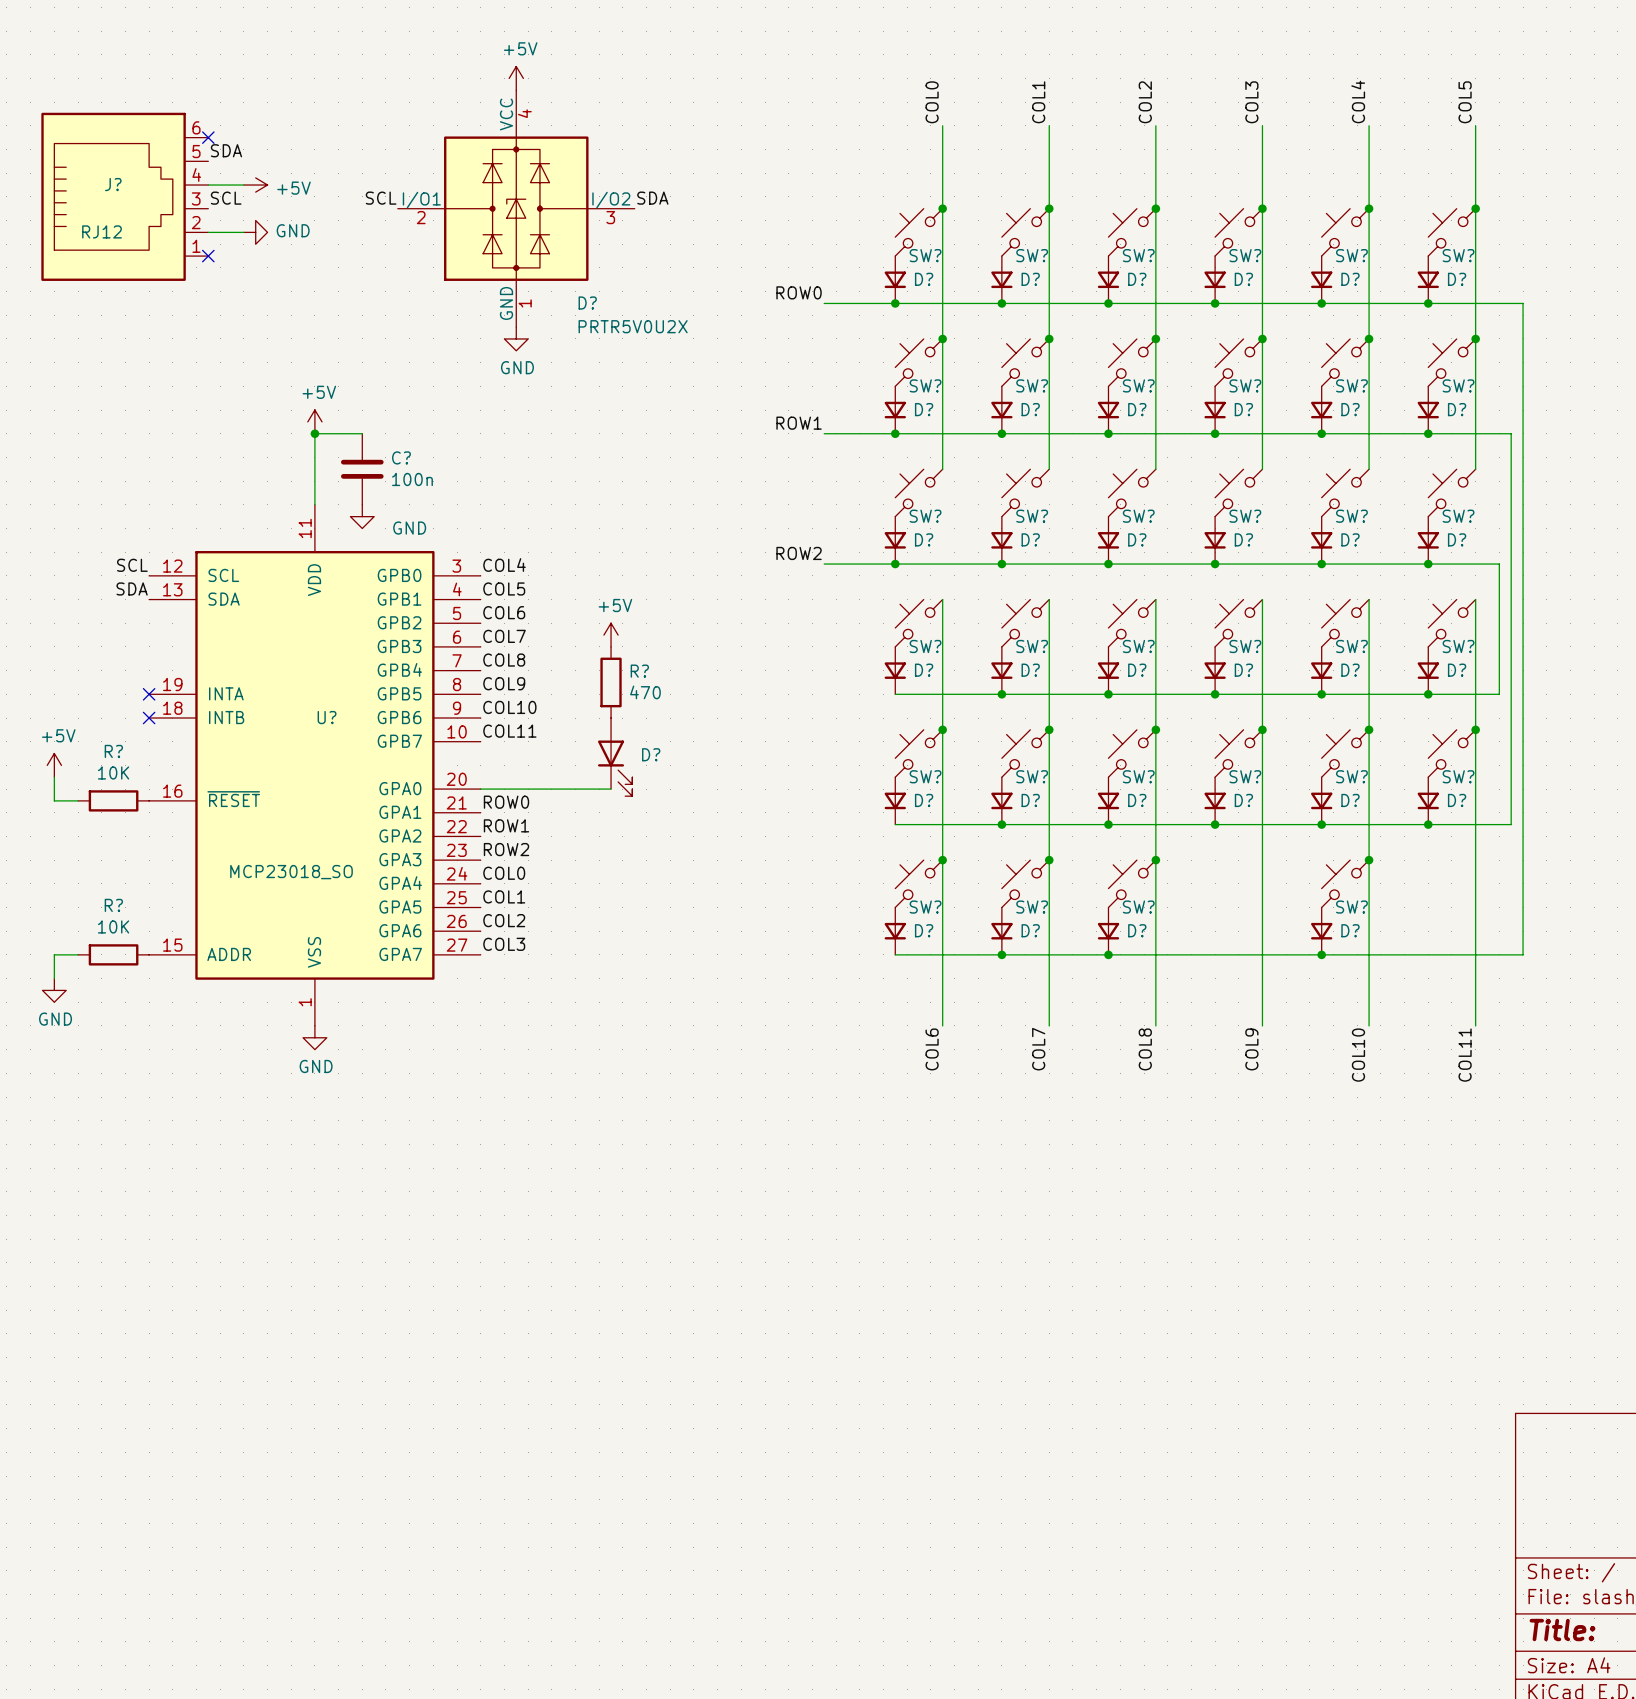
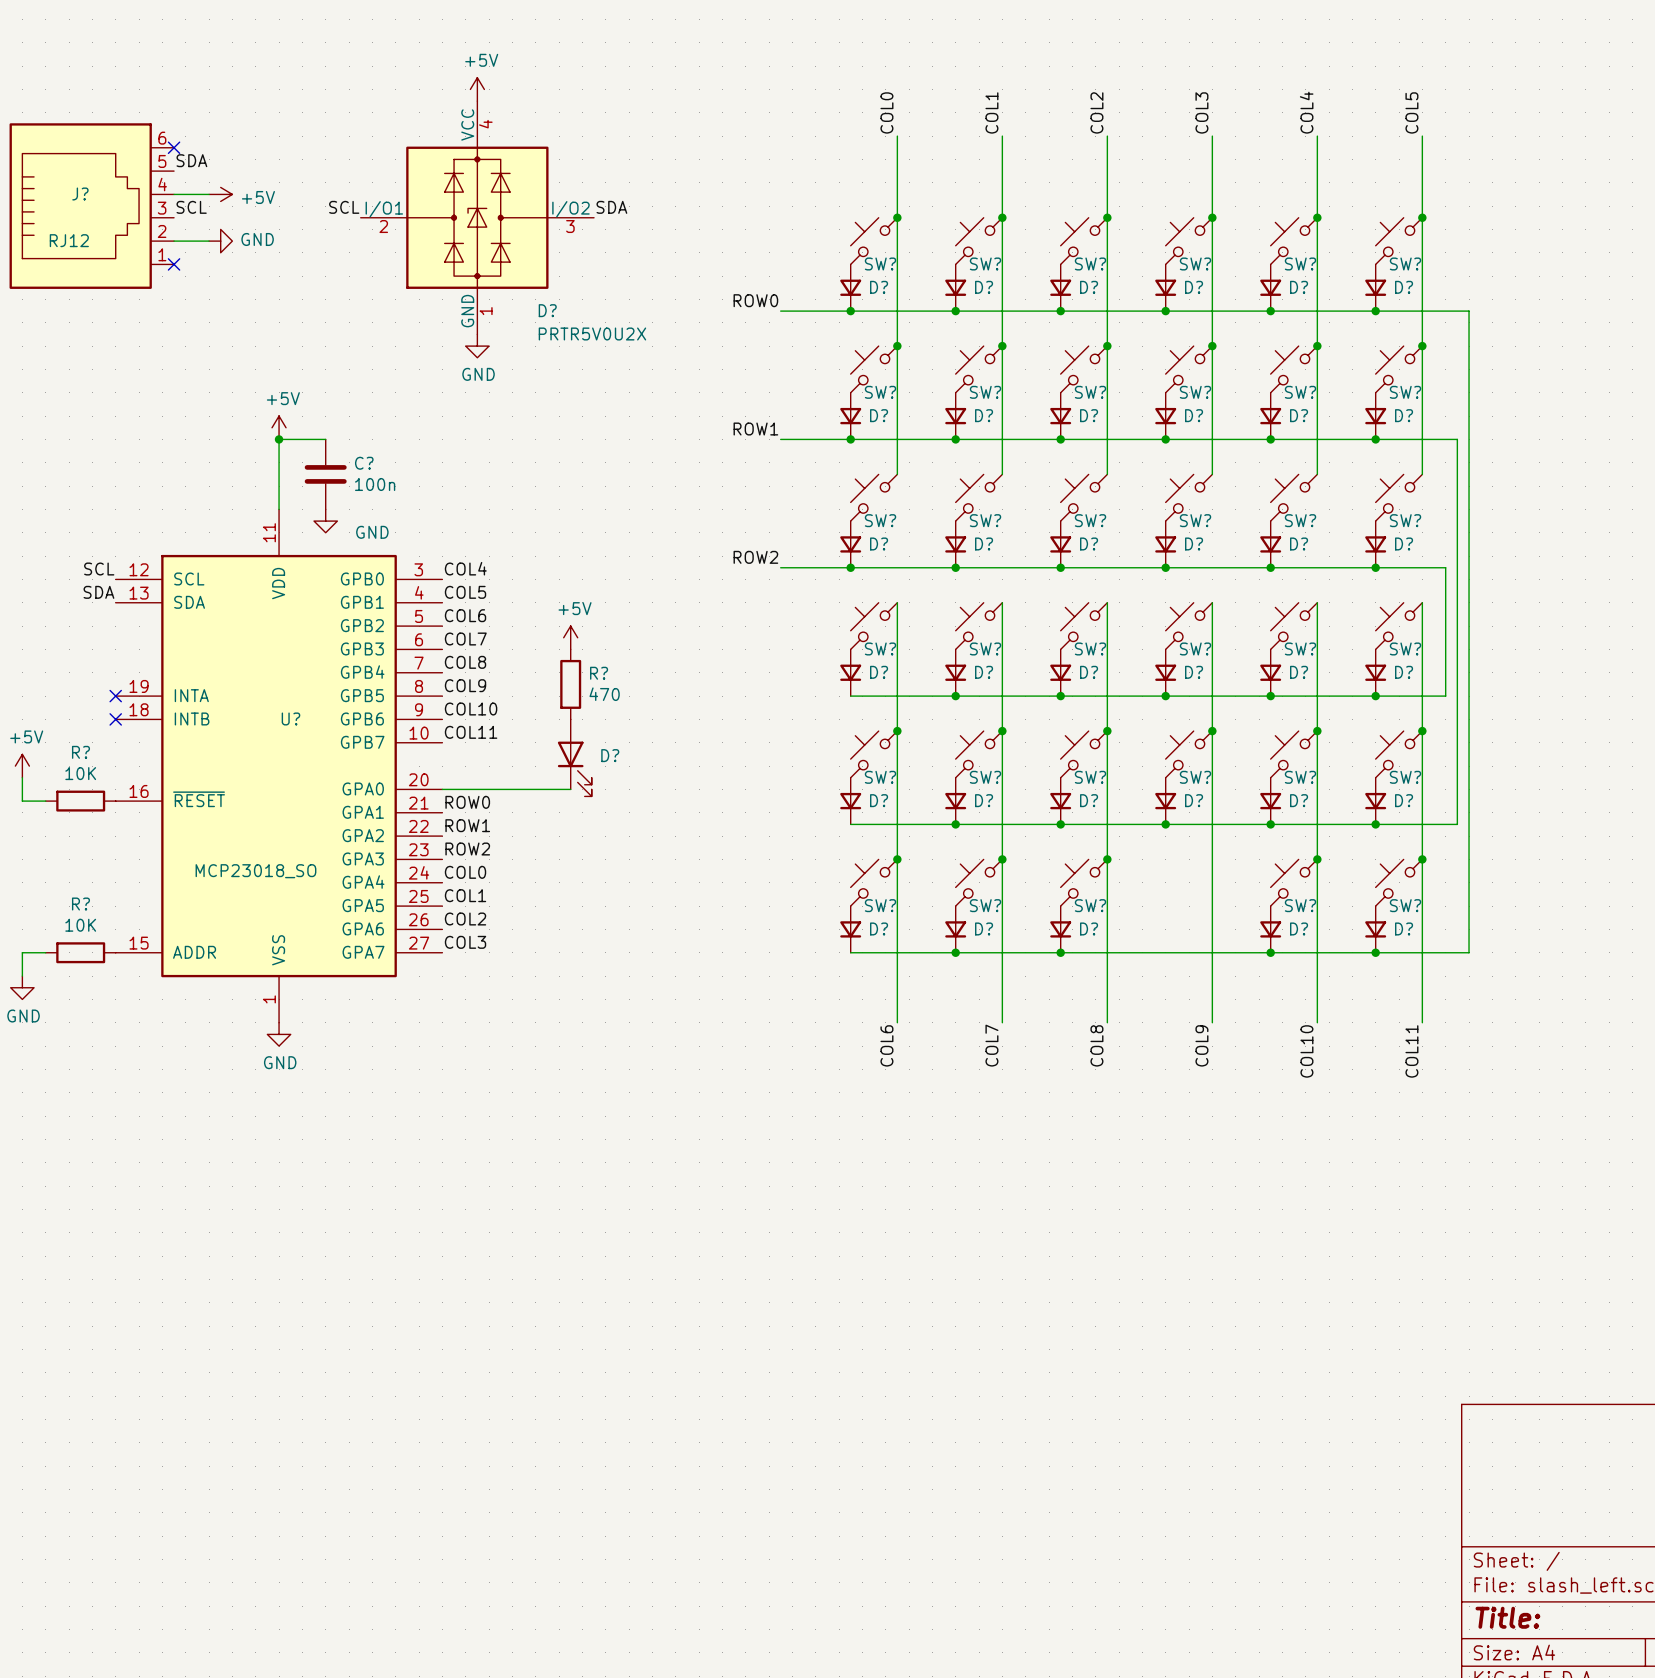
junction: none -> (1422, 859)
SW?: none -> (1399, 882)
D?: none -> (1375, 929)
junction: none -> (1375, 952)

